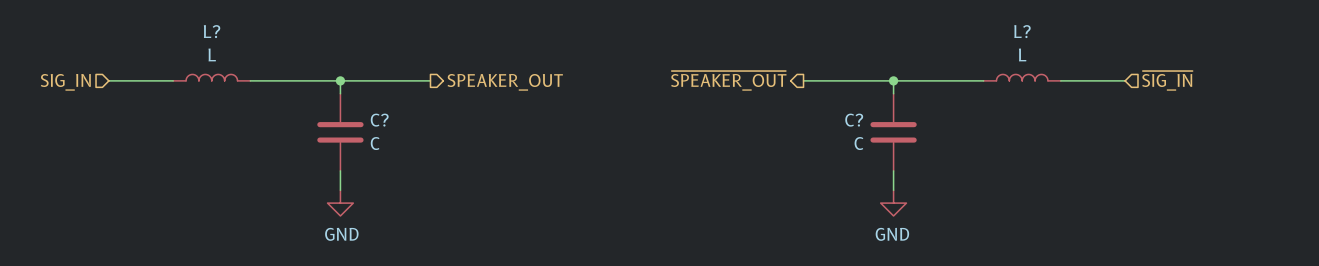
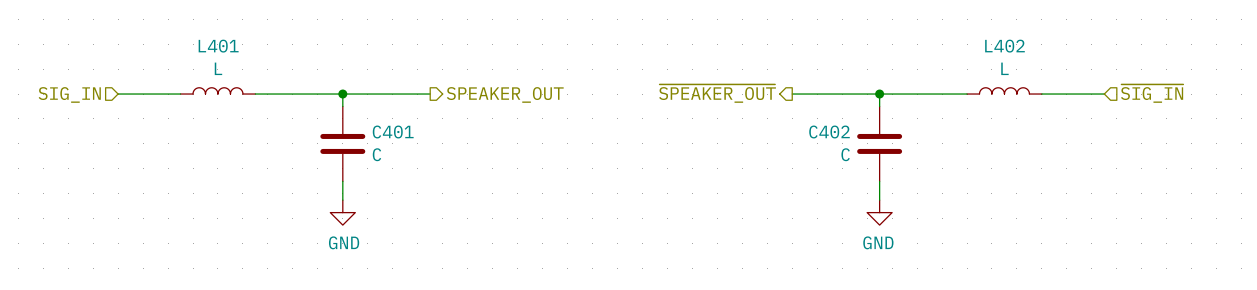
L? name: L? (212, 31) -> L401 (218, 46)
L? name: L? (1022, 31) -> L402 (1004, 46)
C? name: C? (379, 120) -> C401 (393, 132)
C? name: C? (854, 120) -> C402 (829, 132)

